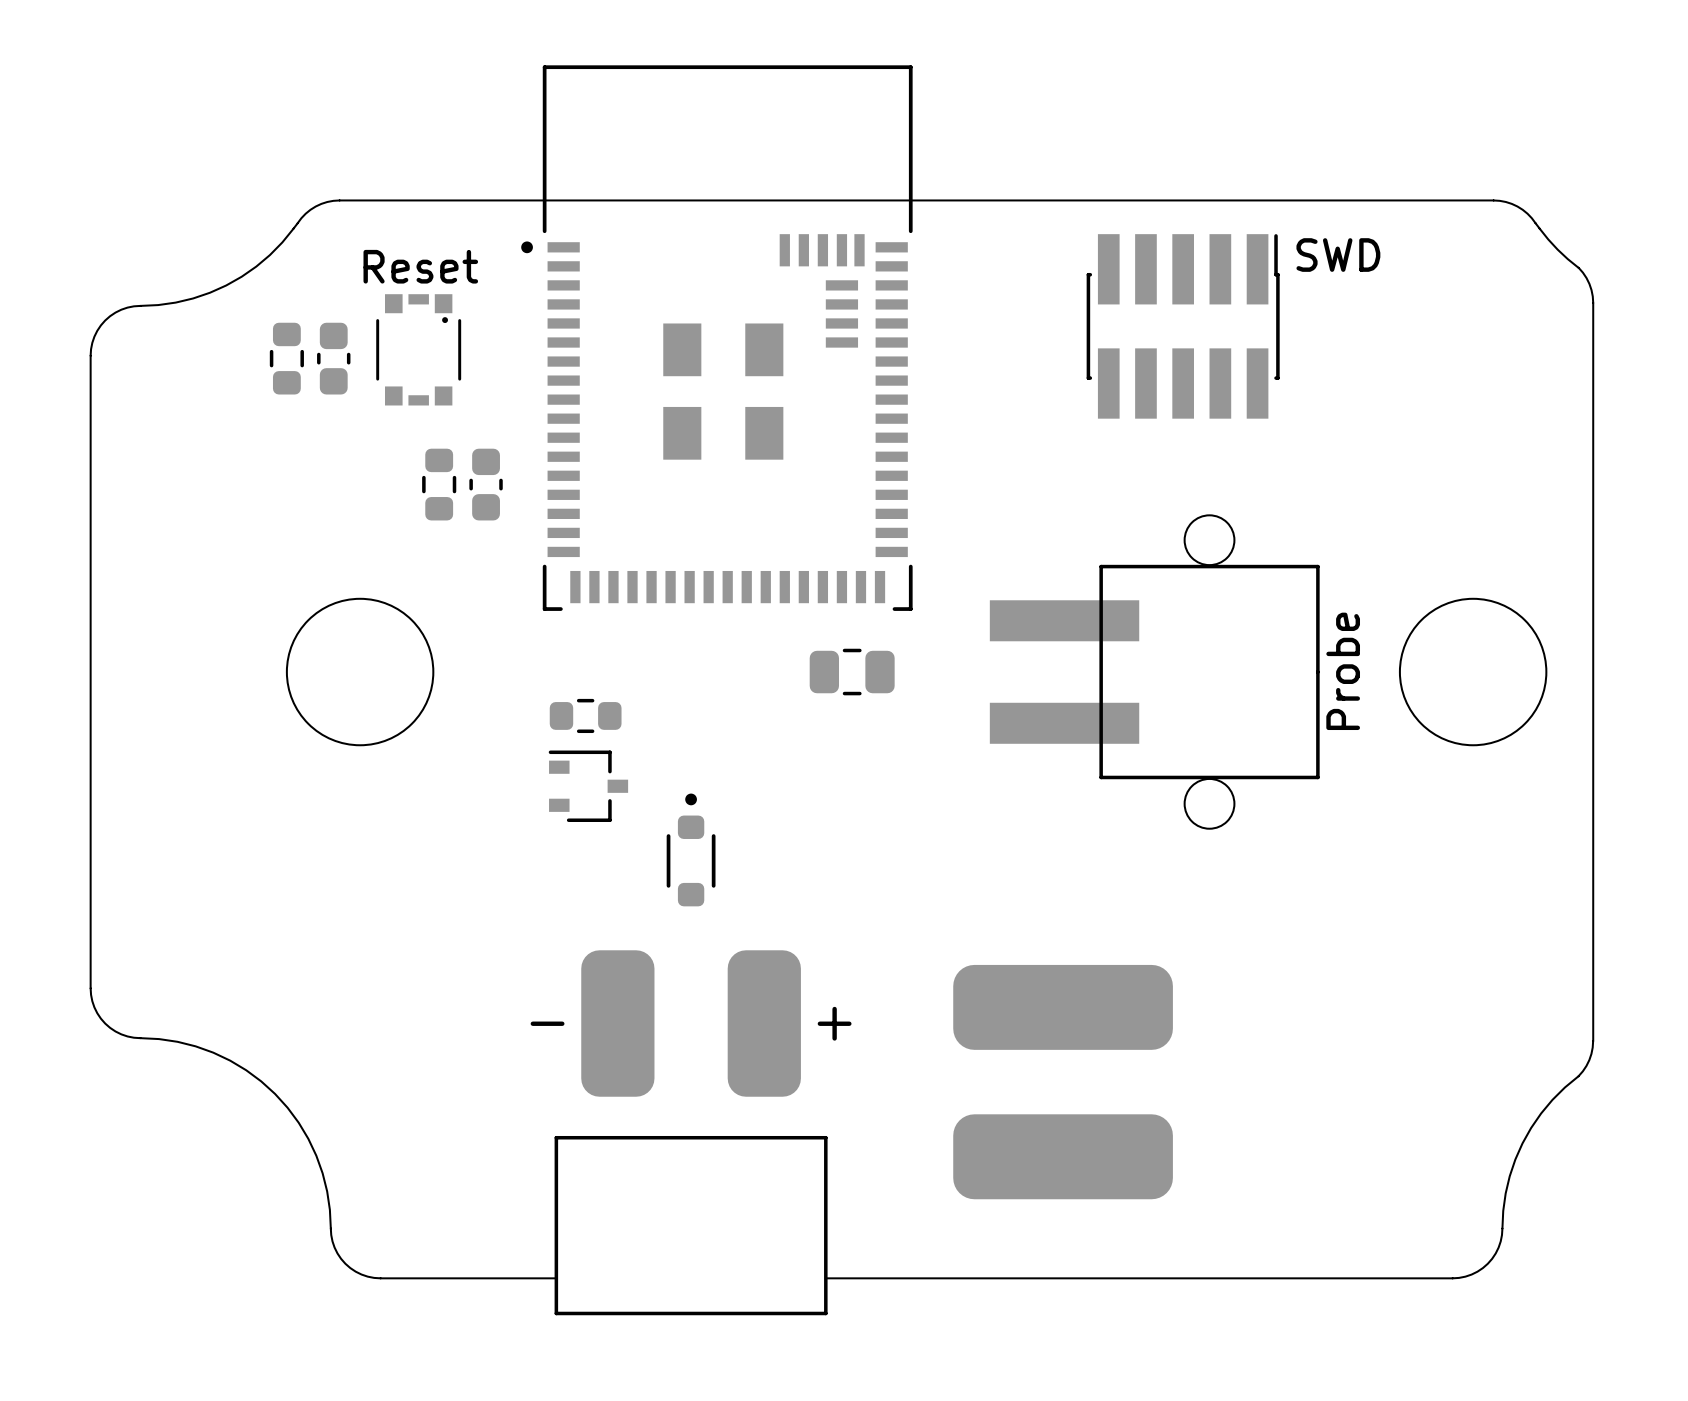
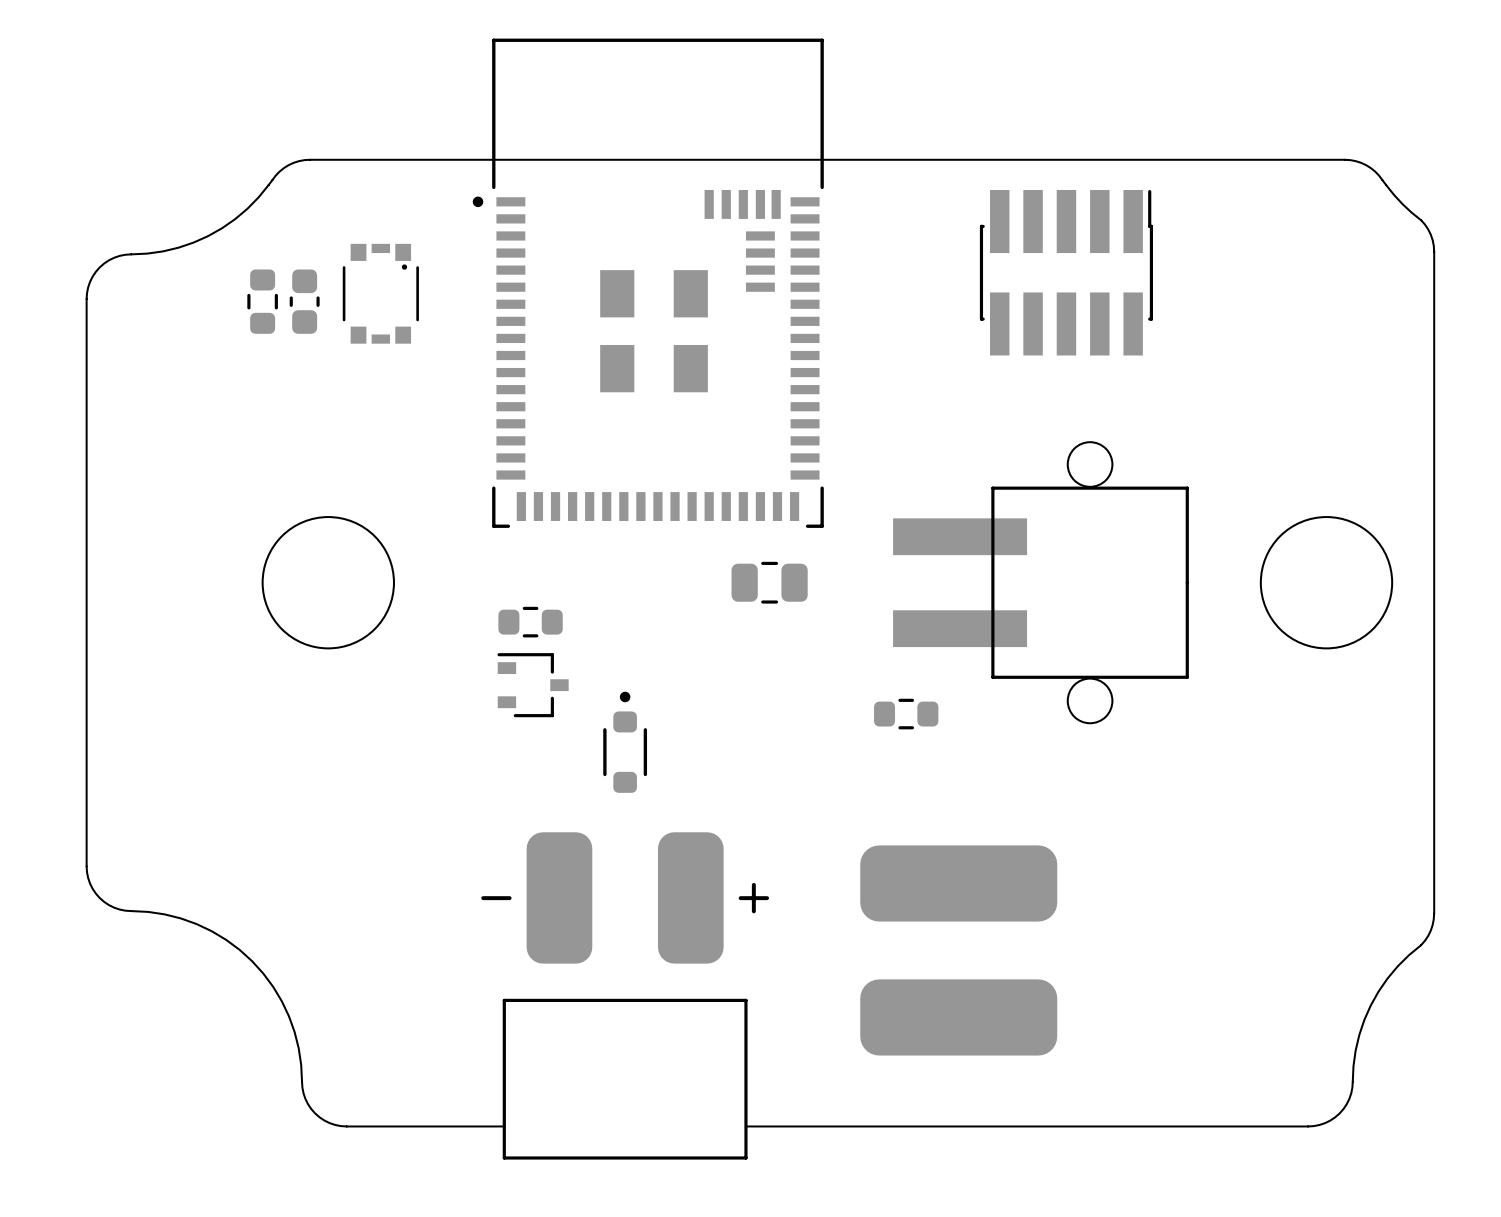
text: SWD (1338, 255) -> none
text: Reset (420, 266) -> none
part rotation: 0° (439, 484) -> 90° clockwise (906, 714)
part position: (439, 484) -> (906, 714)
part: (486, 484) -> none
text: Probe (1343, 671) -> none

